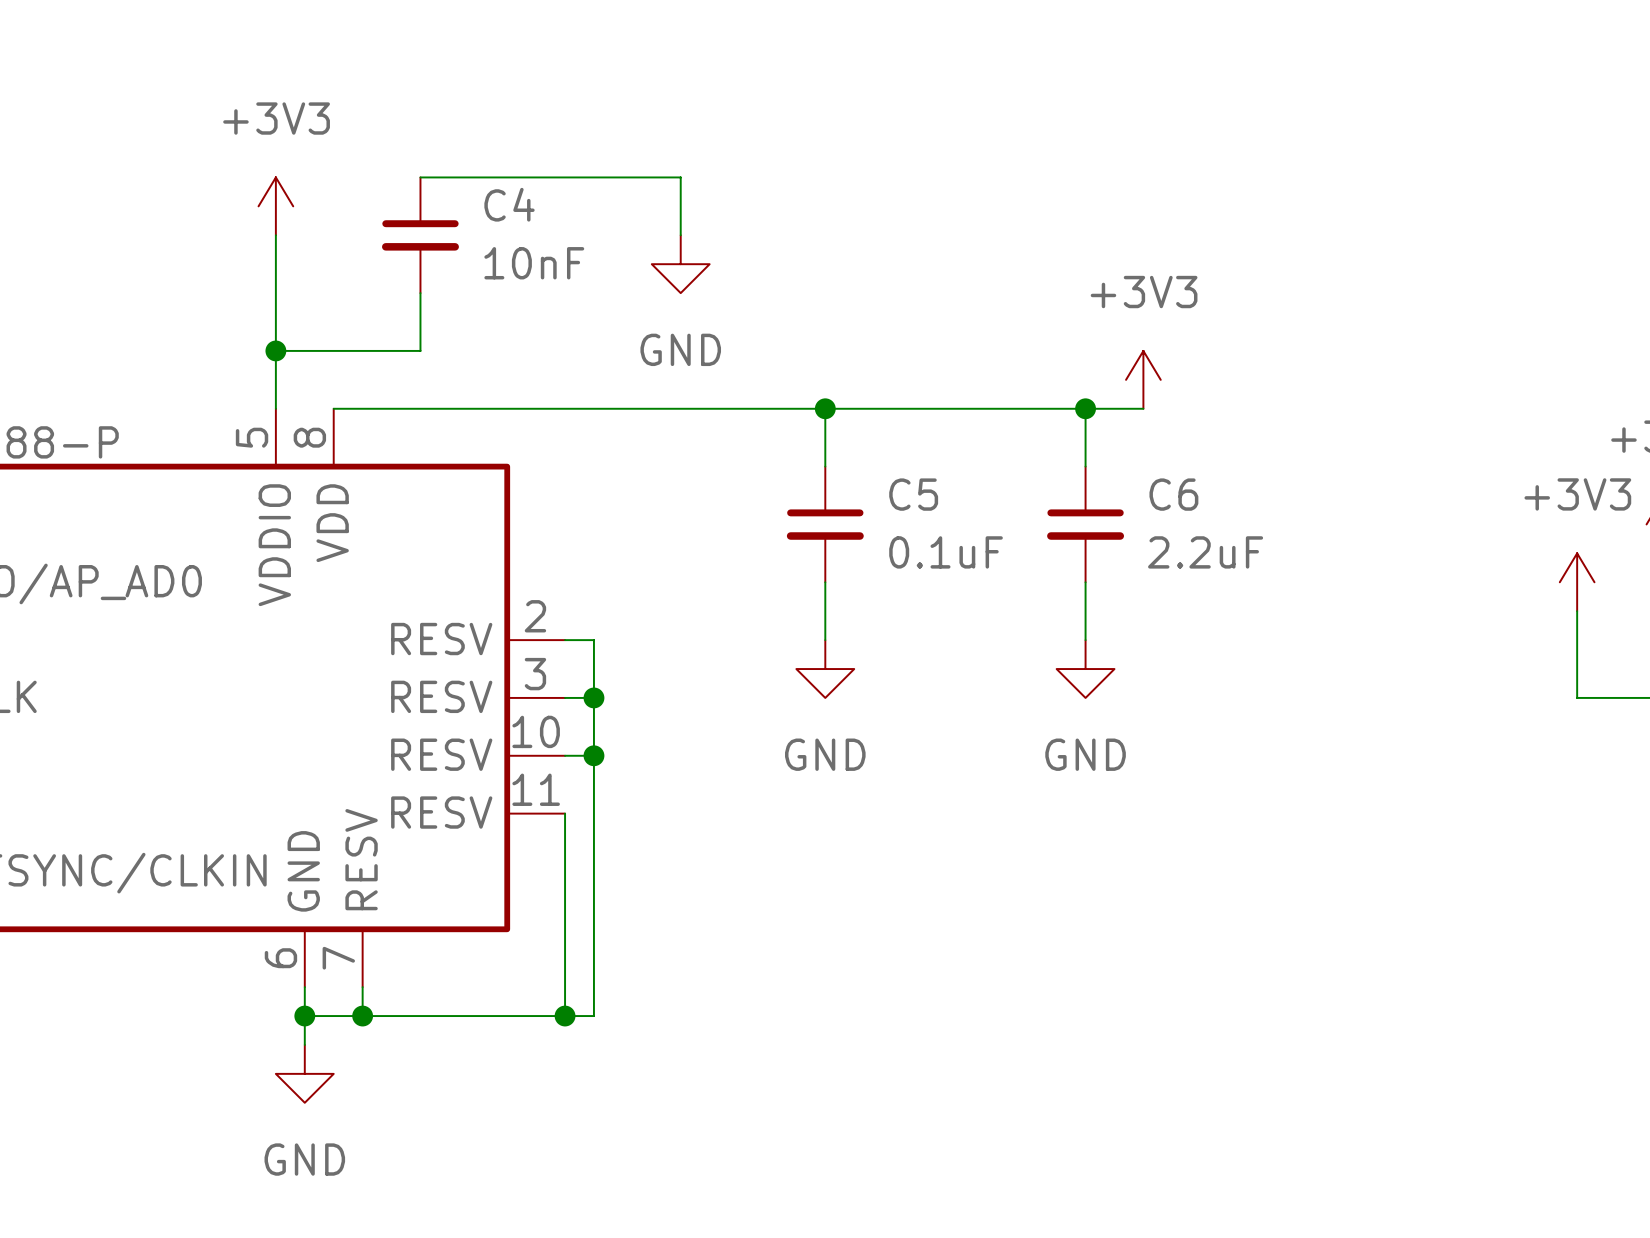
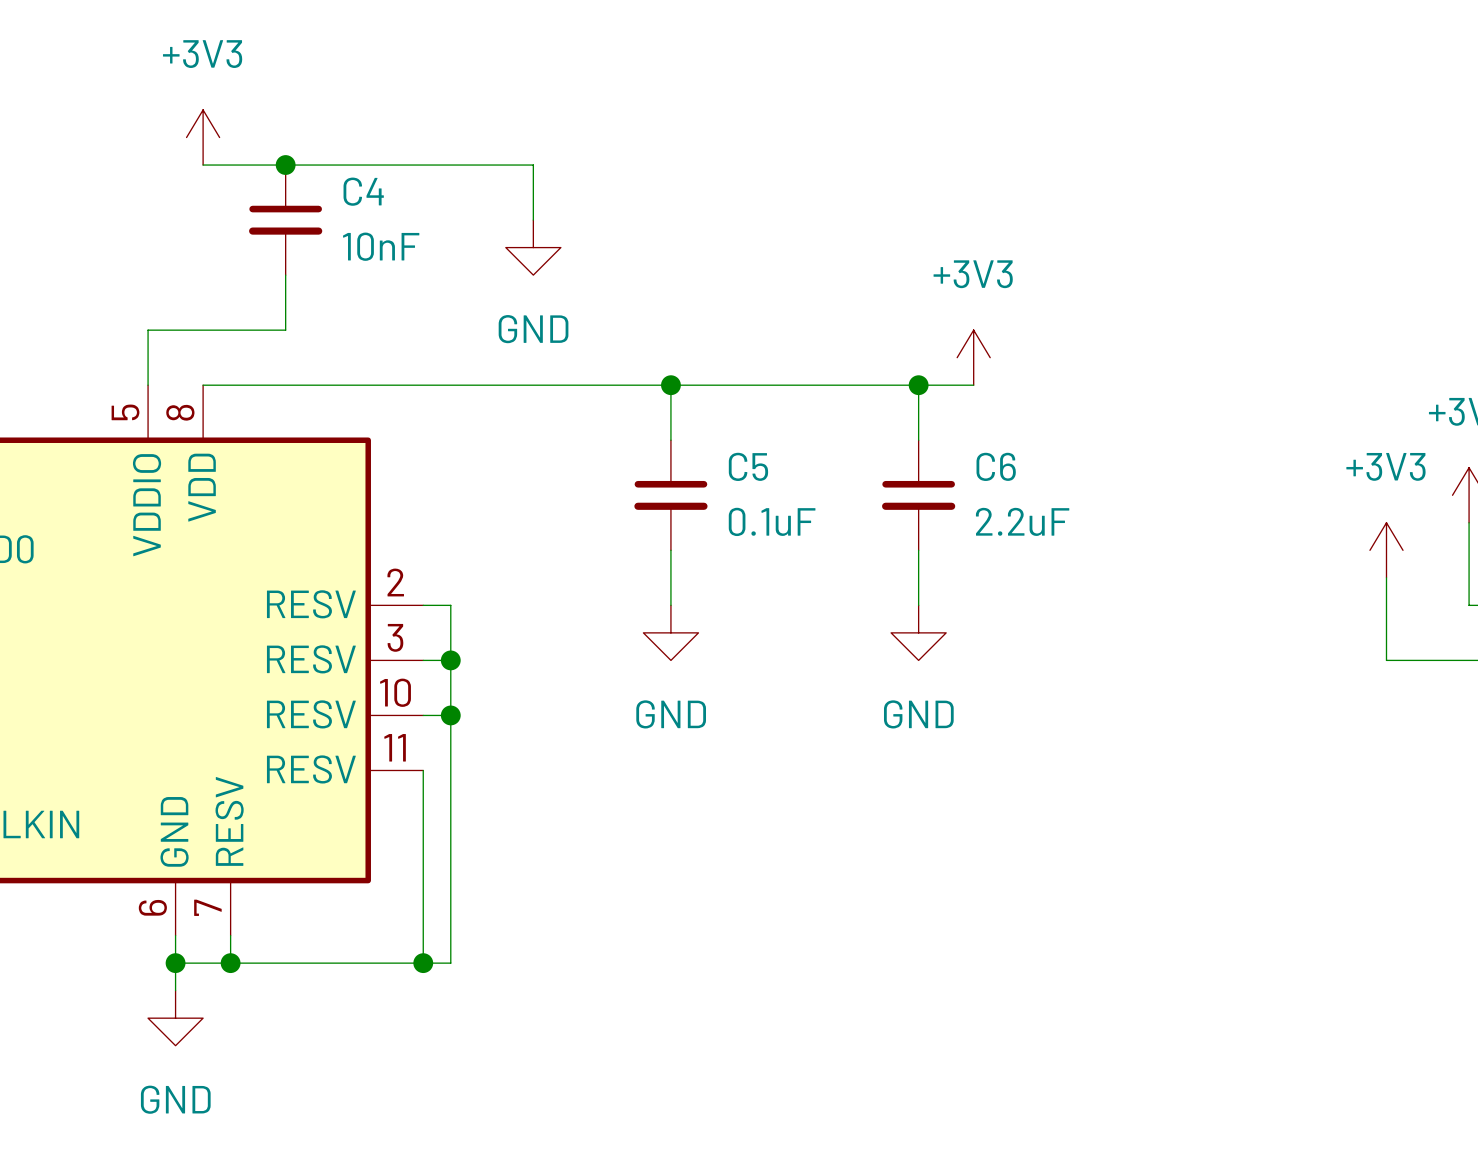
wire: none -> (203, 165) (285, 165)
junction: none -> (285, 165)
power symbol position: +3V3 (275, 206) -> +3V3 (203, 137)
wire: (275, 235) (275, 350) -> none
junction: (275, 350) -> none

